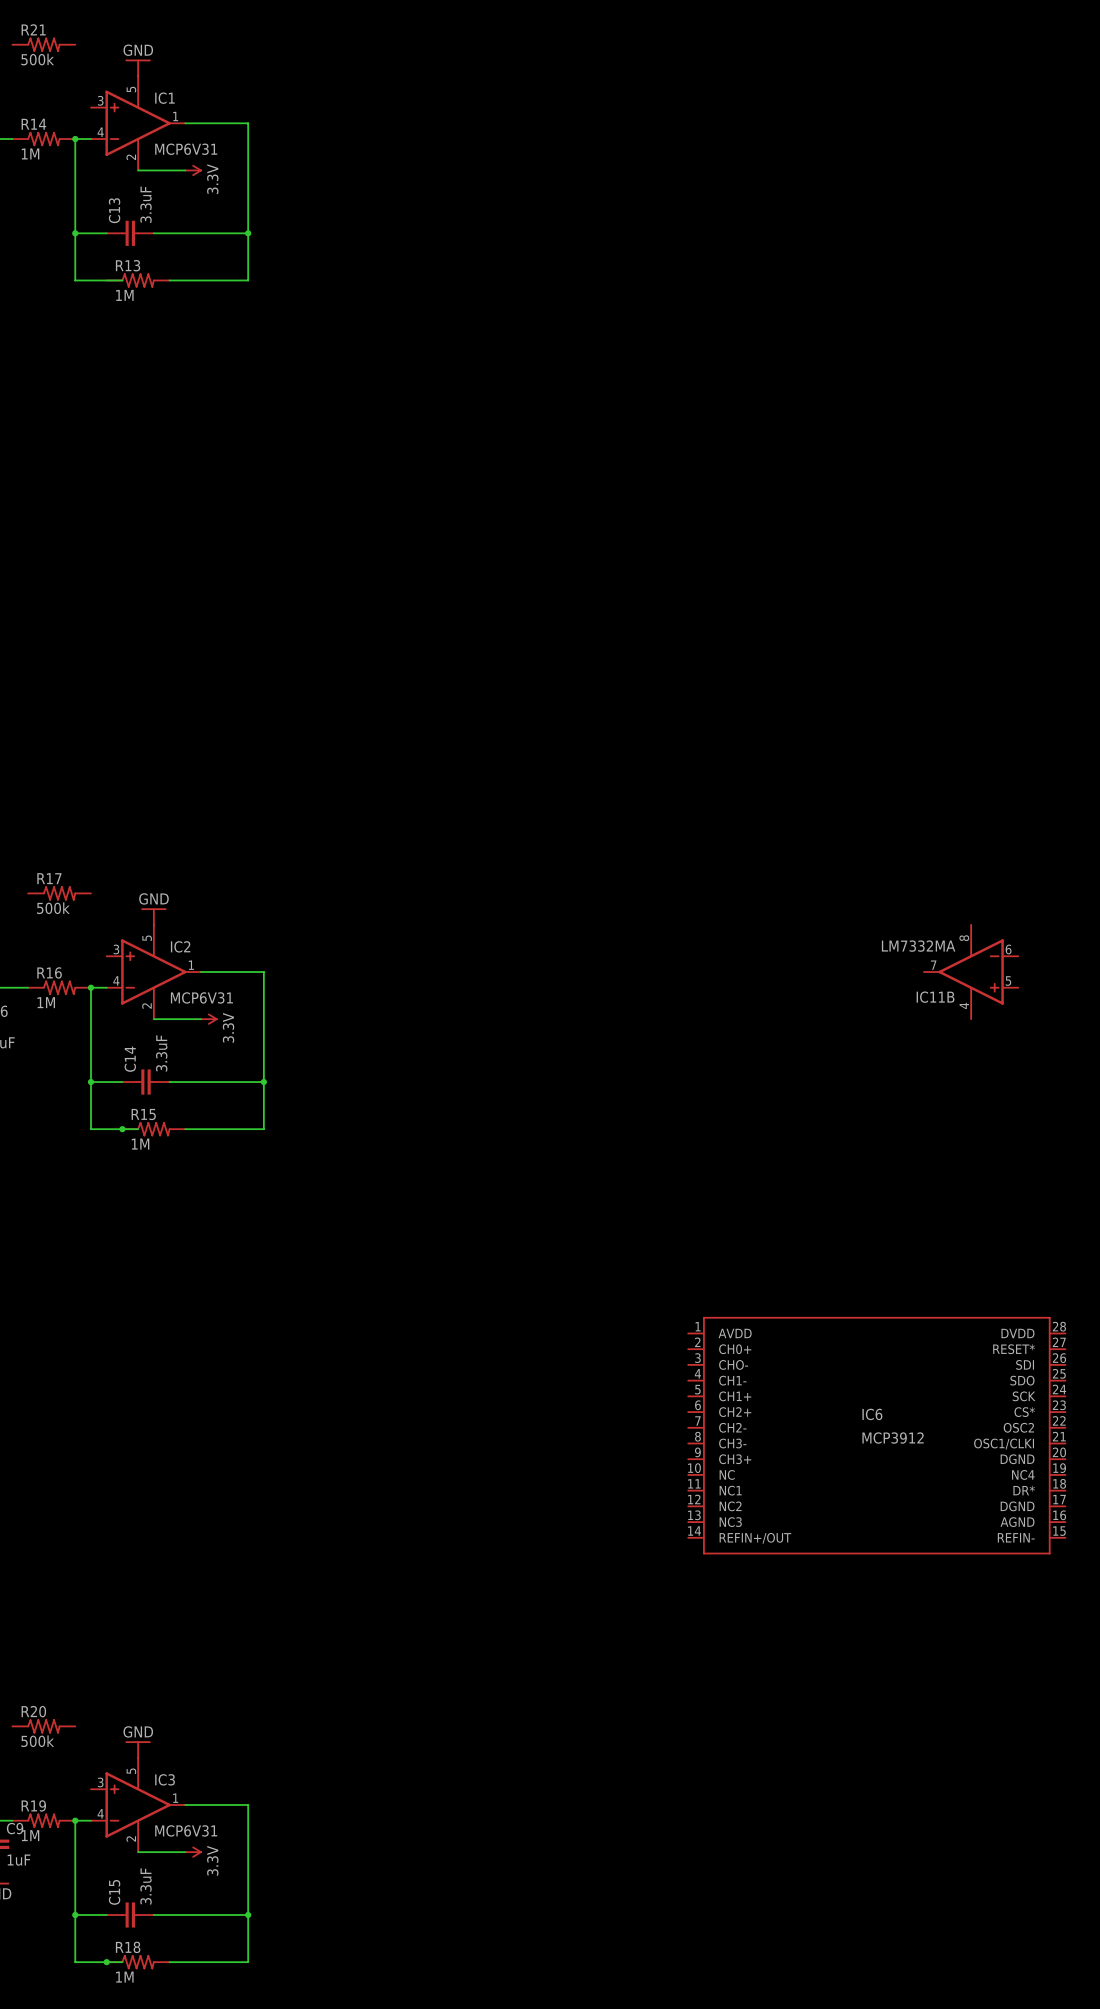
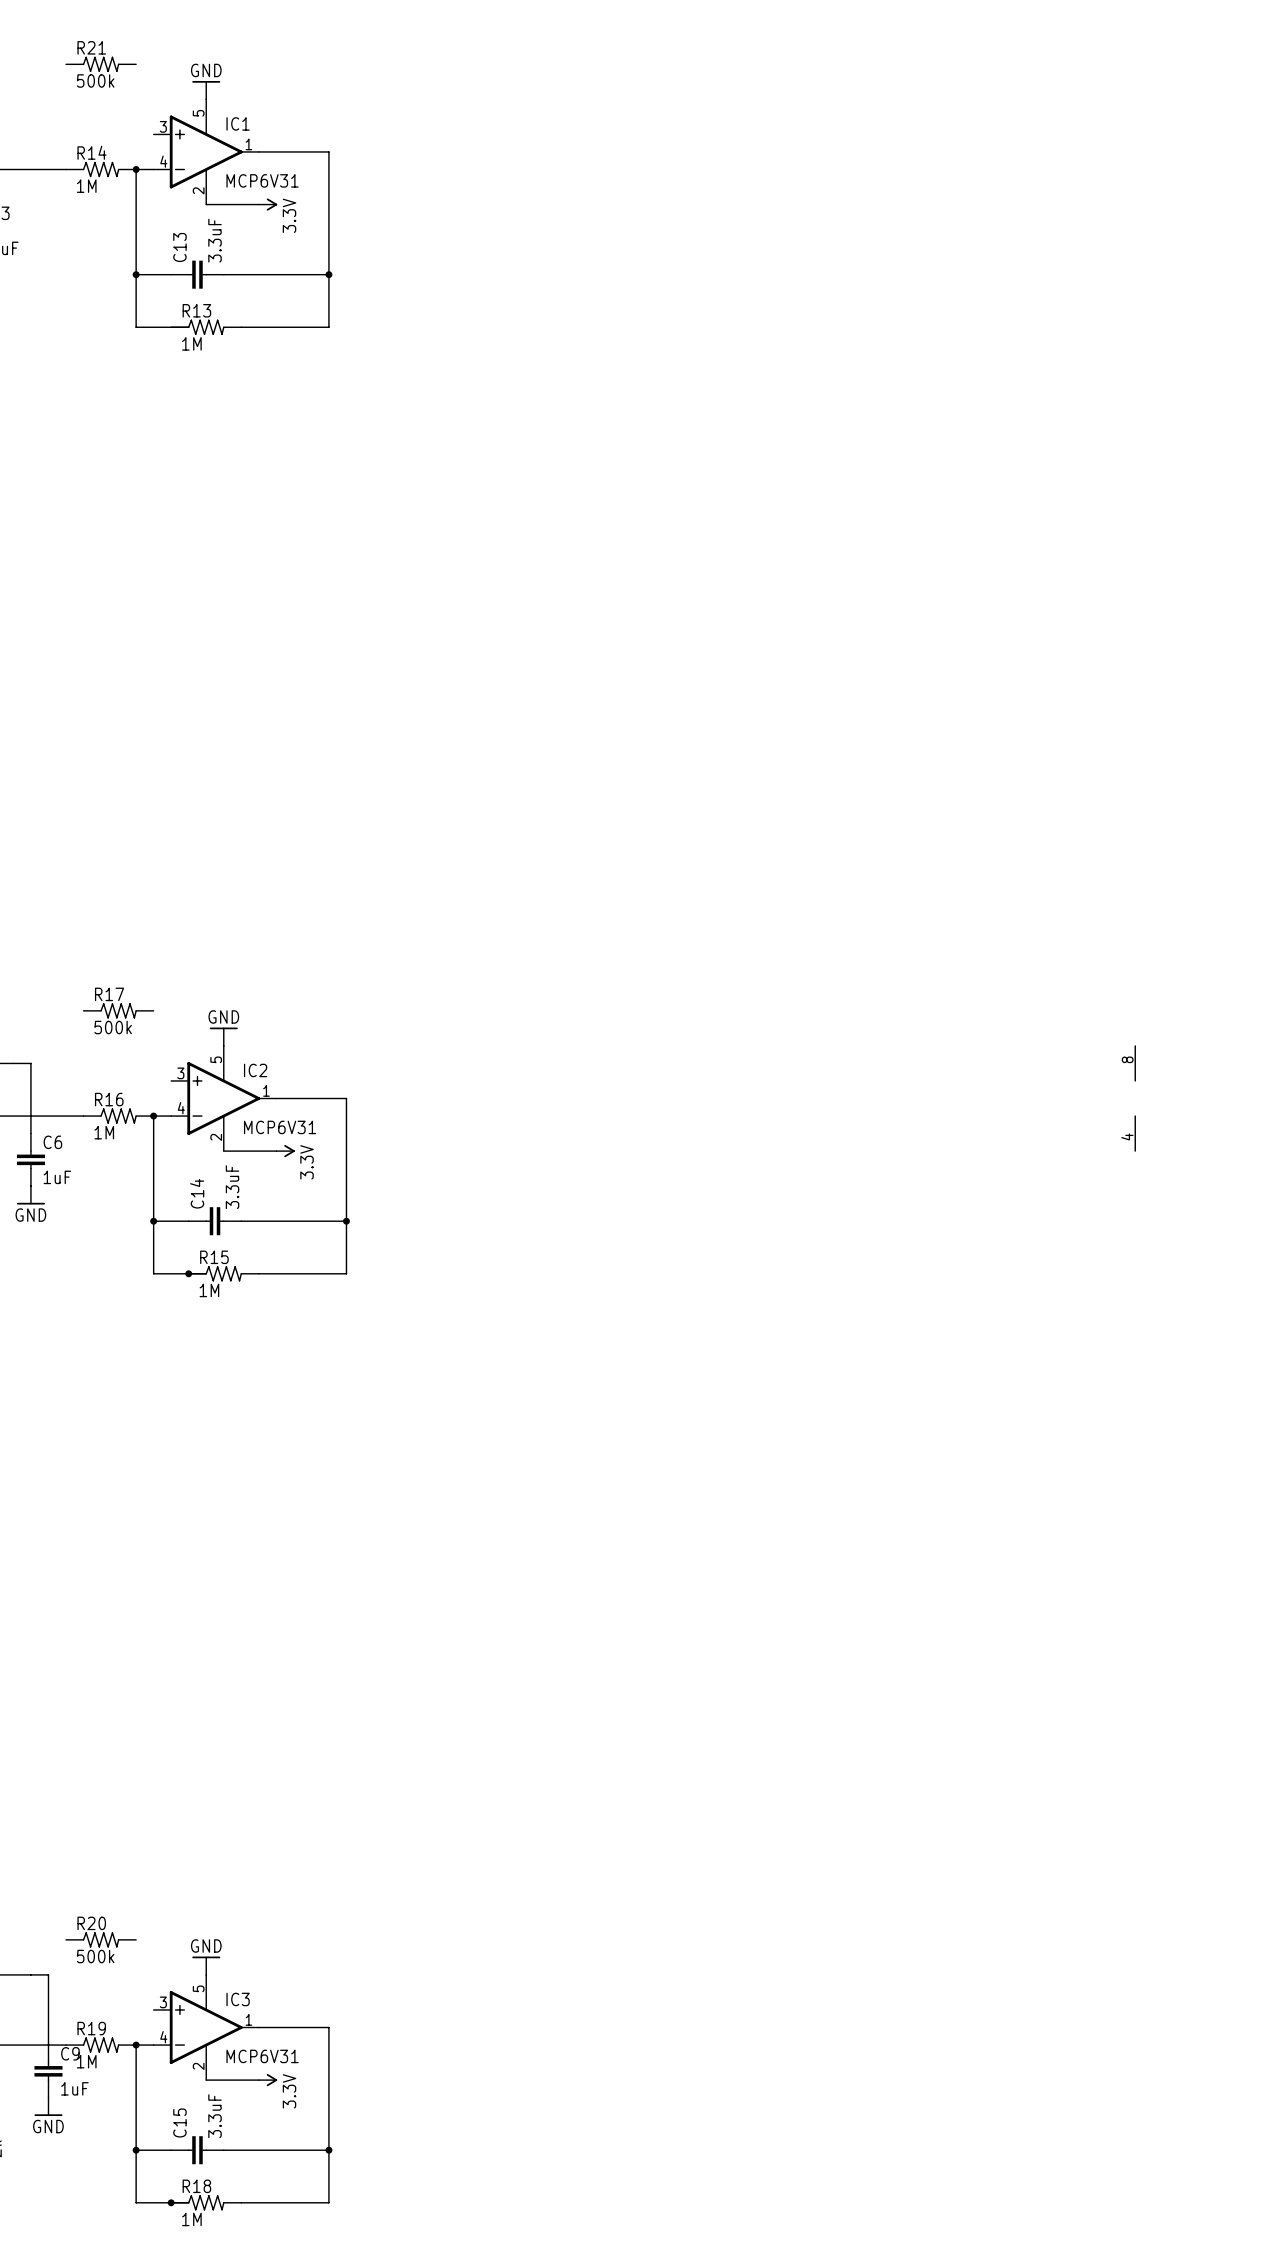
IC11B: LM7332MA (971, 972) -> none
IC6: MCP3912 (876, 1435) -> none

